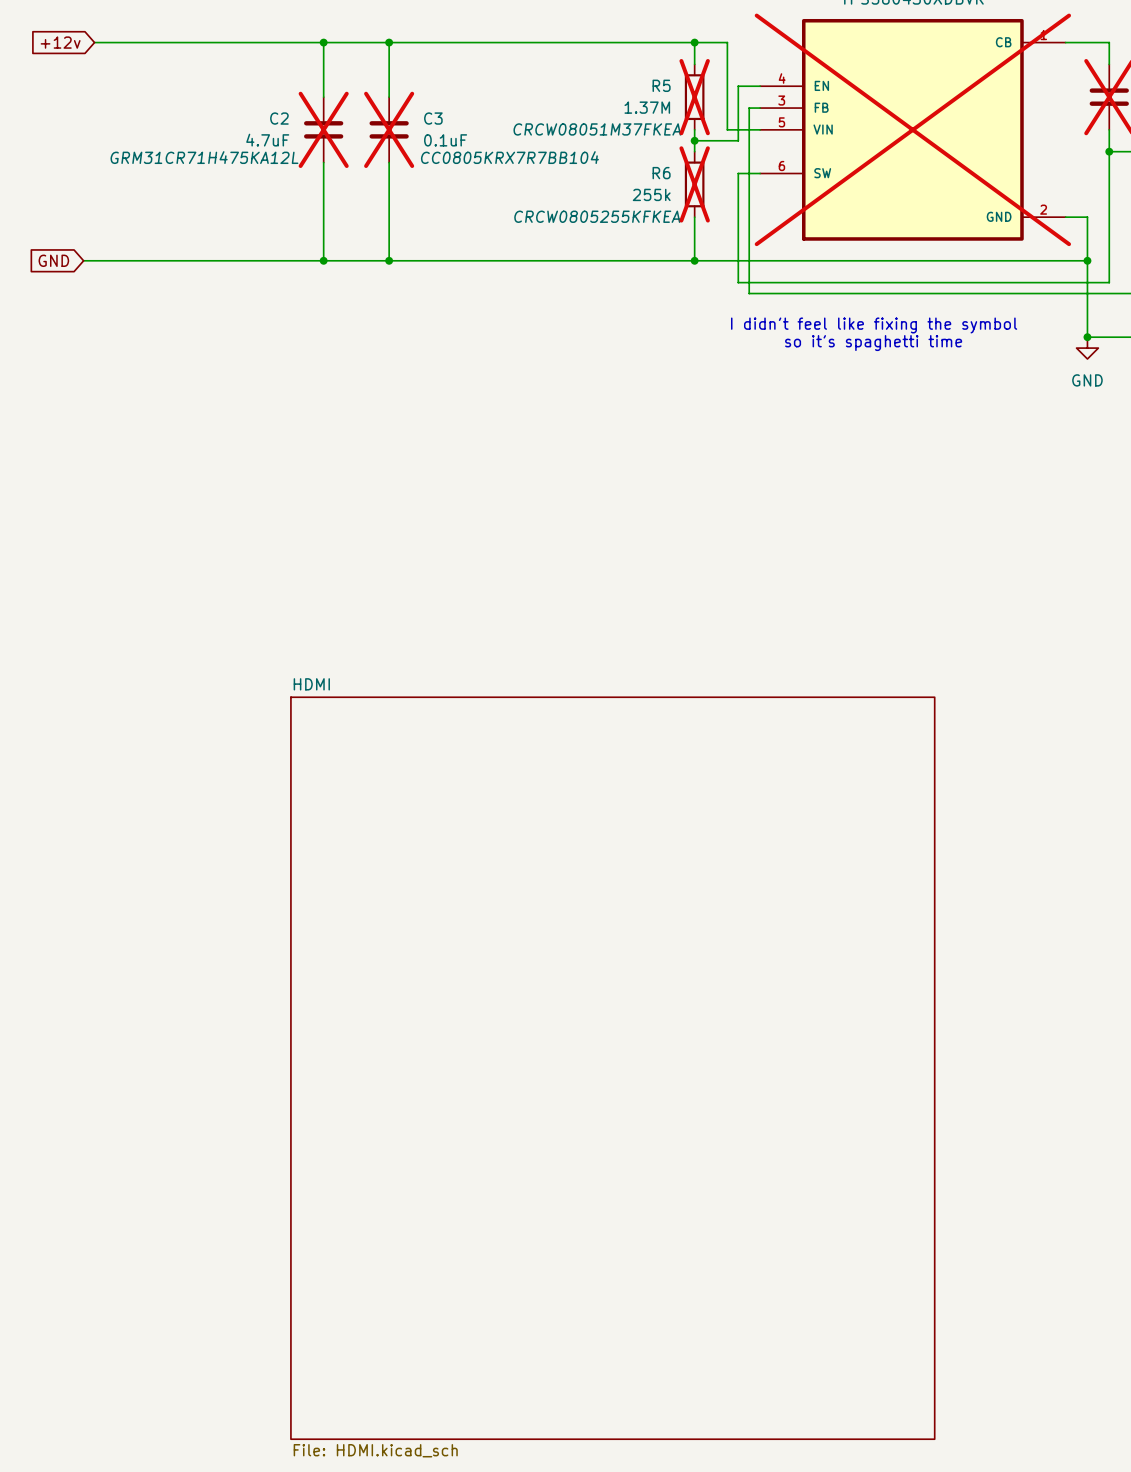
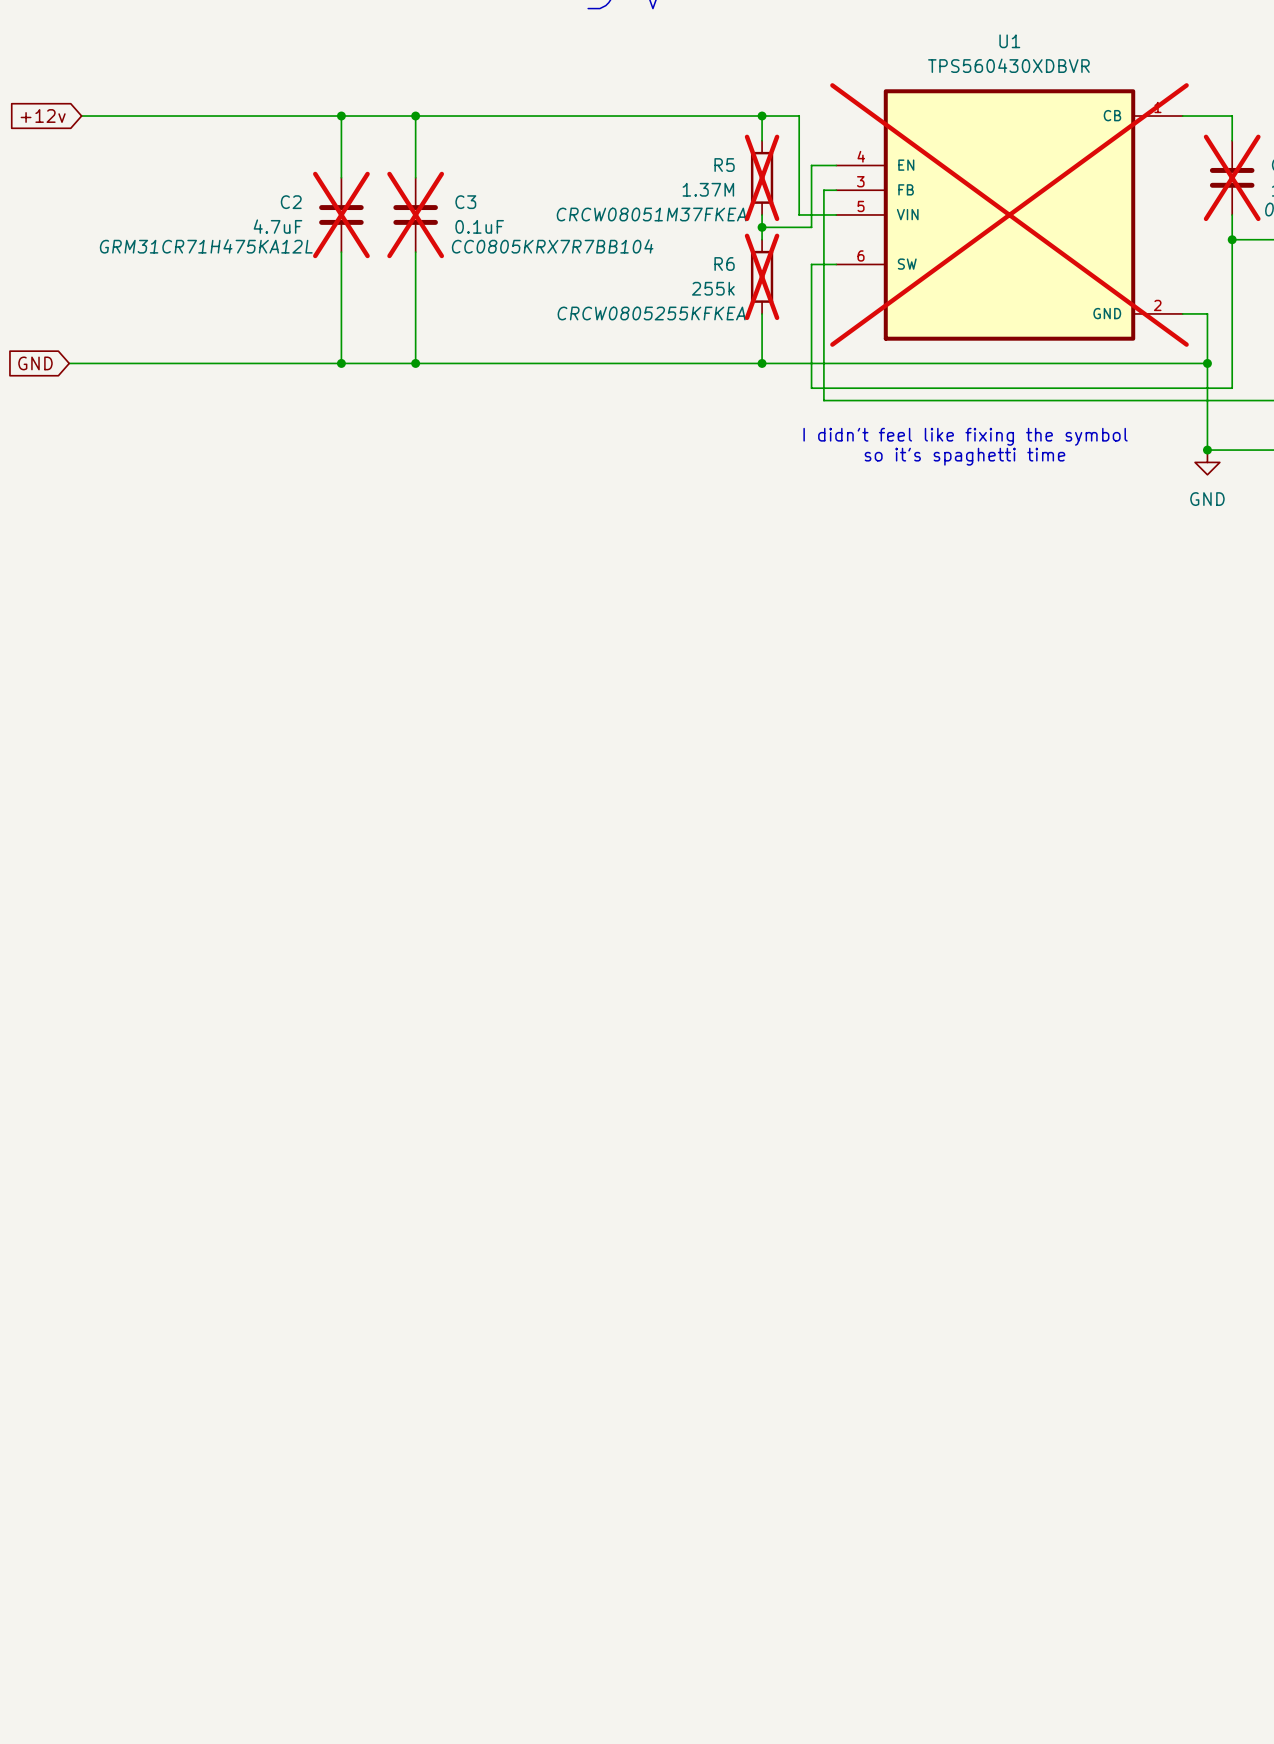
sheet HDMI: File: HDMI.kicad_sch (612, 1068) -> none

